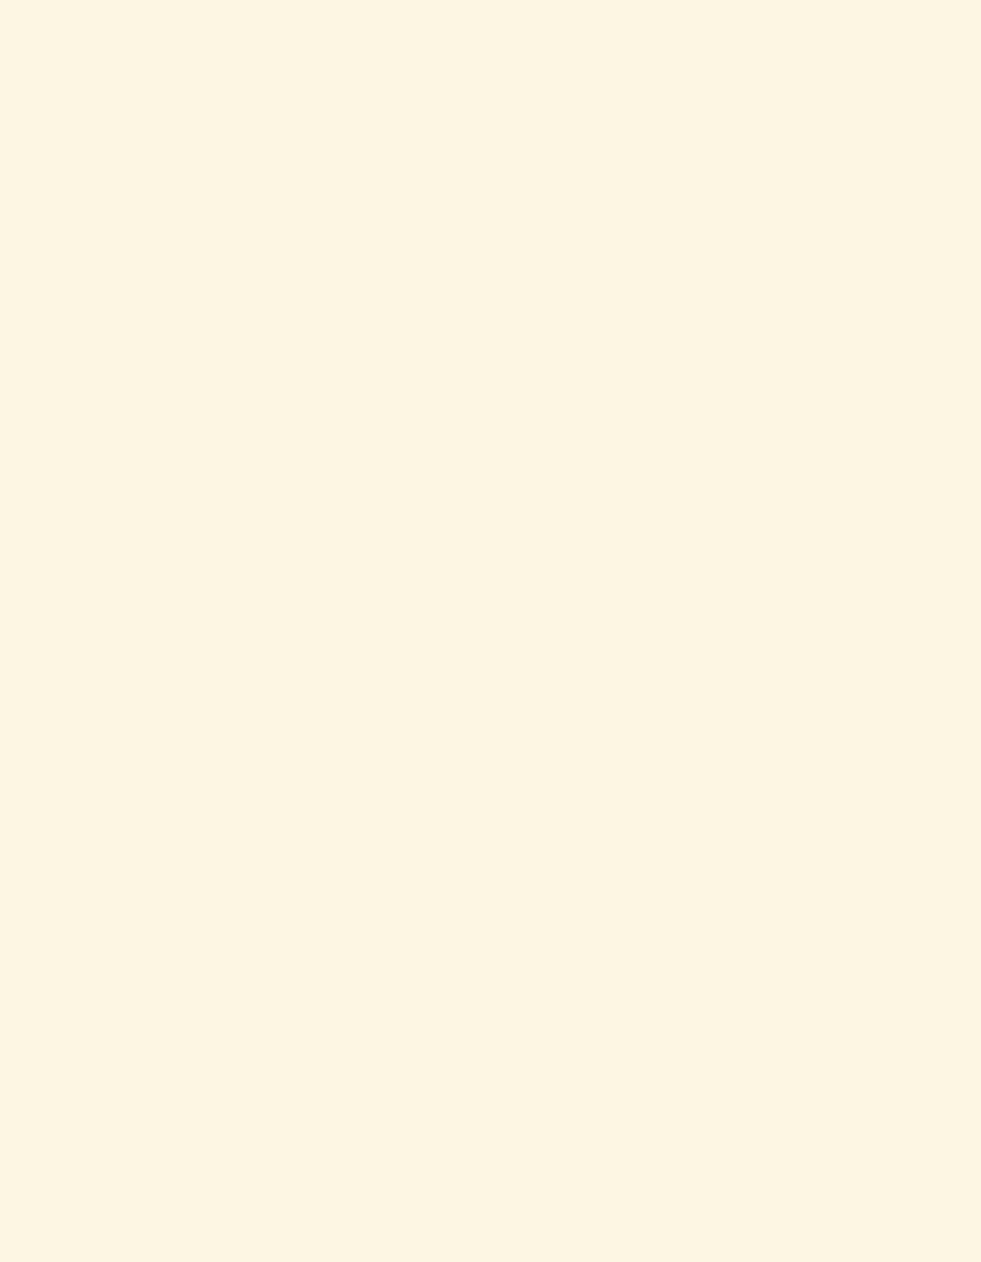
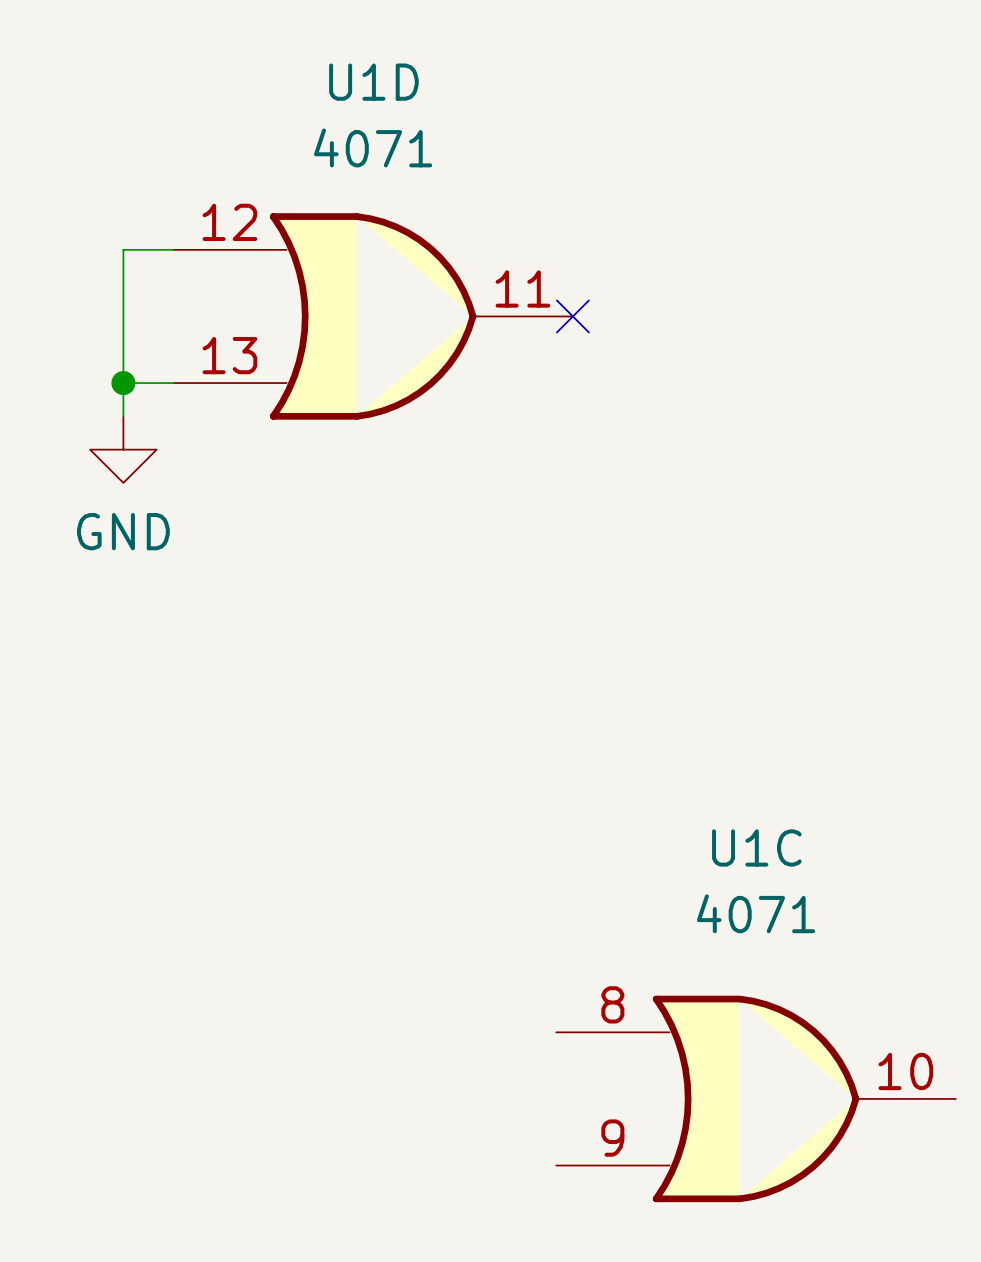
wire: none -> (173, 249) (123, 249) (123, 416)
U1D: none -> 4071 (373, 316)
no-connect mark: none -> (572, 316)
wire: none -> (123, 383) (173, 383)
junction: none -> (123, 383)
power symbol: none -> GND (123, 449)
U1C: none -> 4071 (756, 1098)

